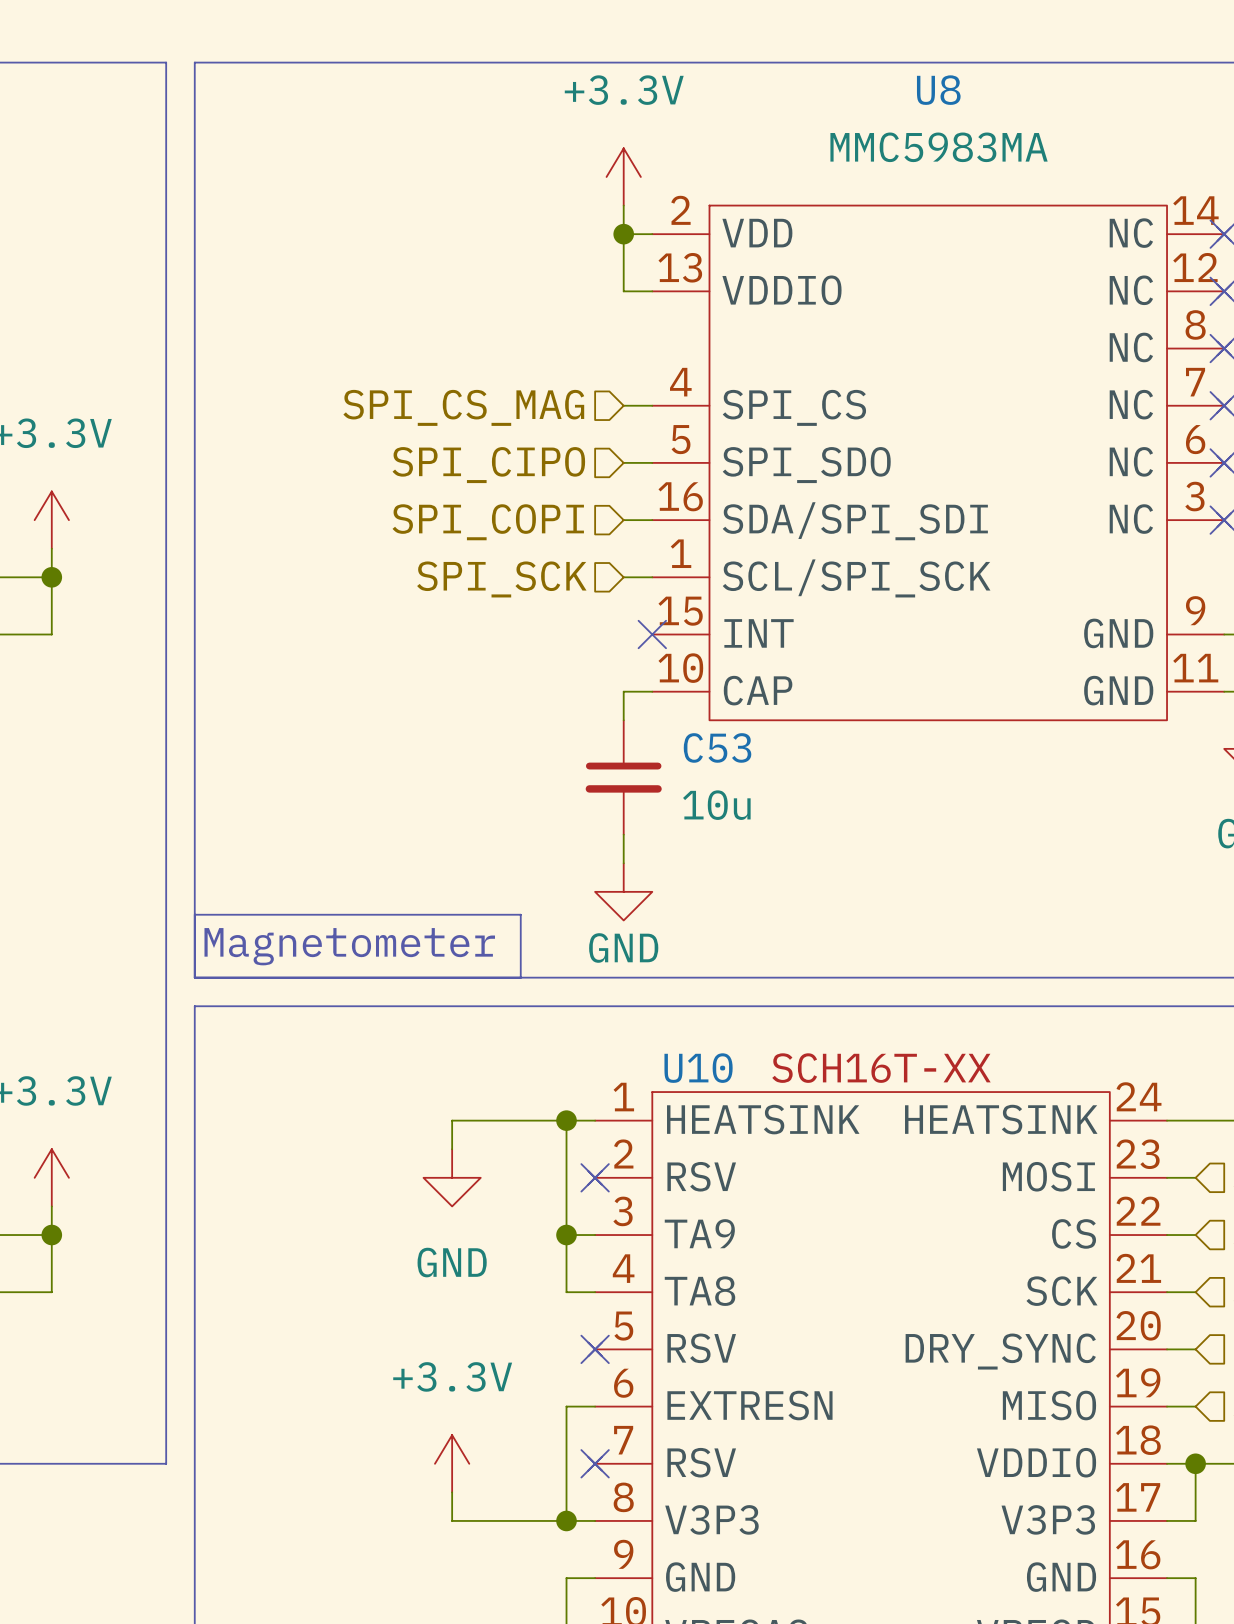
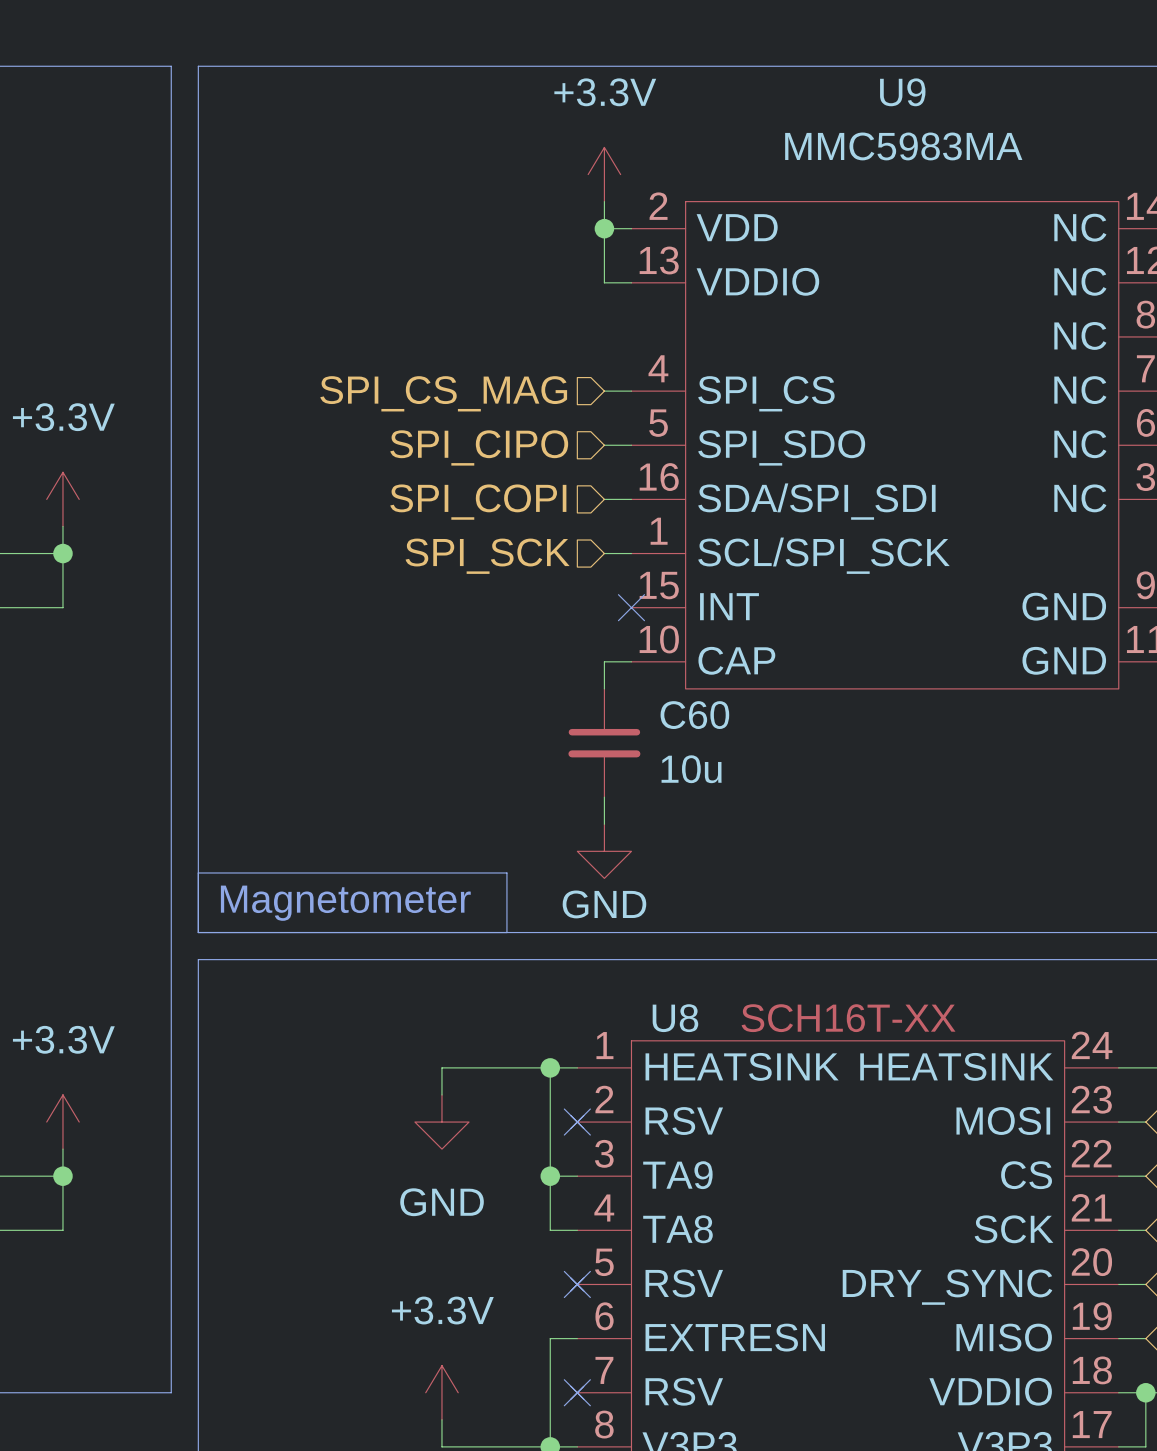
U8 name: U8 (938, 90) -> U9 (902, 92)
C53 name: C53 (717, 747) -> C60 (694, 715)
U10 name: U10 (698, 1068) -> U8 (675, 1018)

